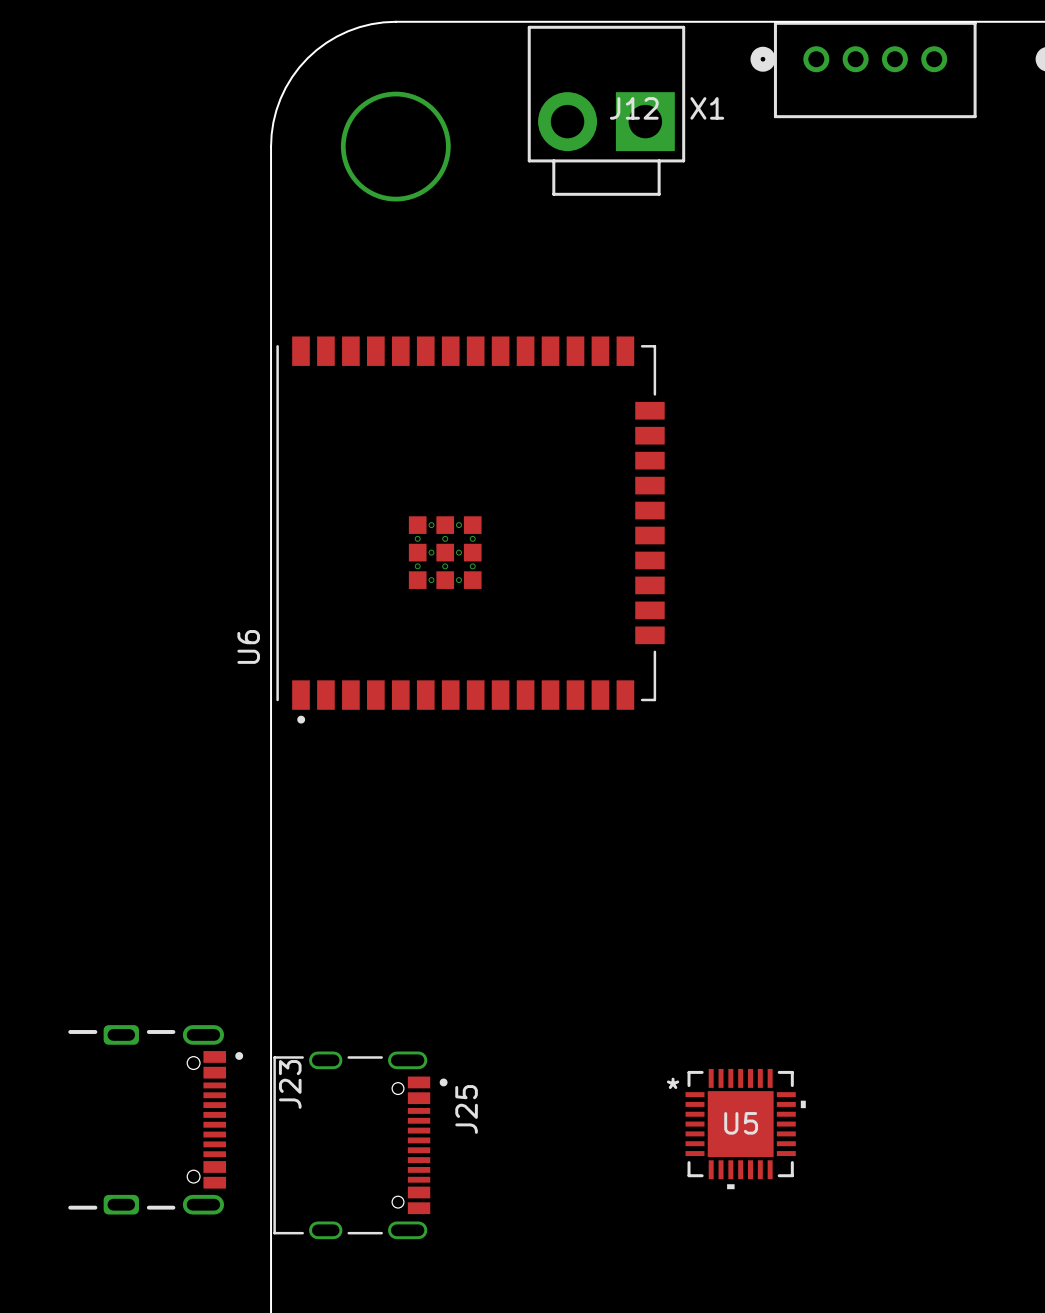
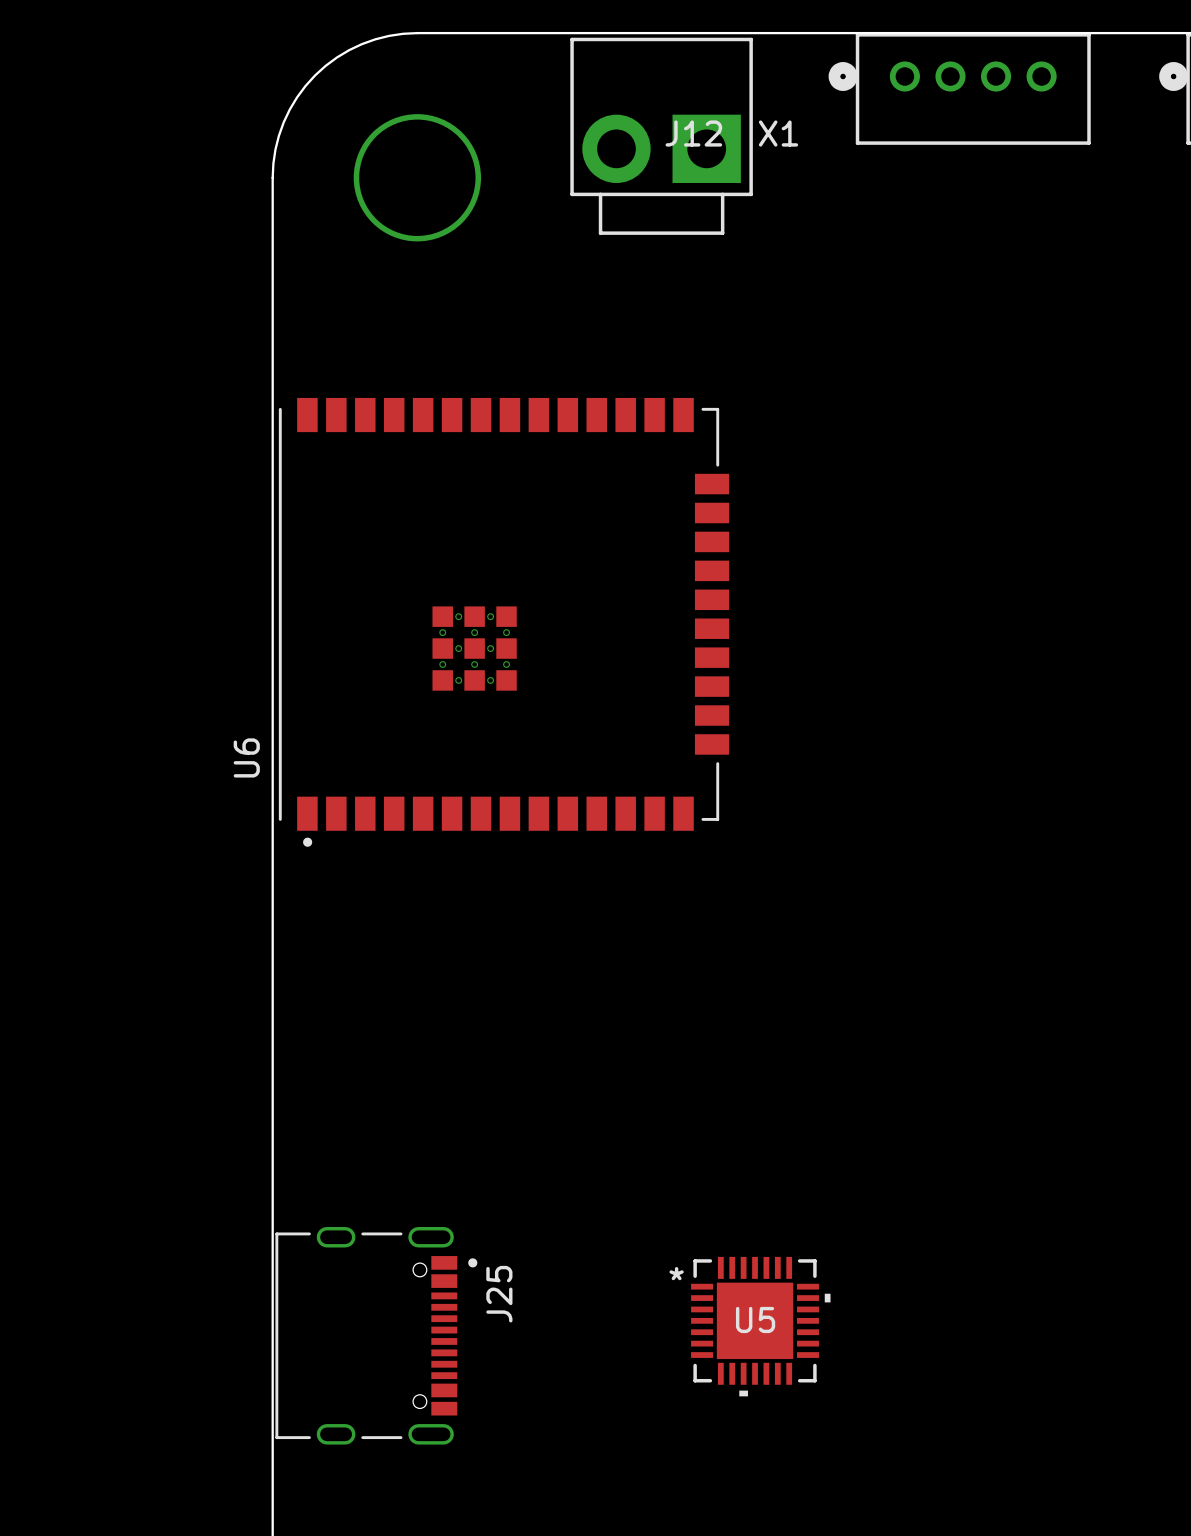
J23: (155, 1119) -> none
U5 position: (745, 1129) -> (760, 1326)

